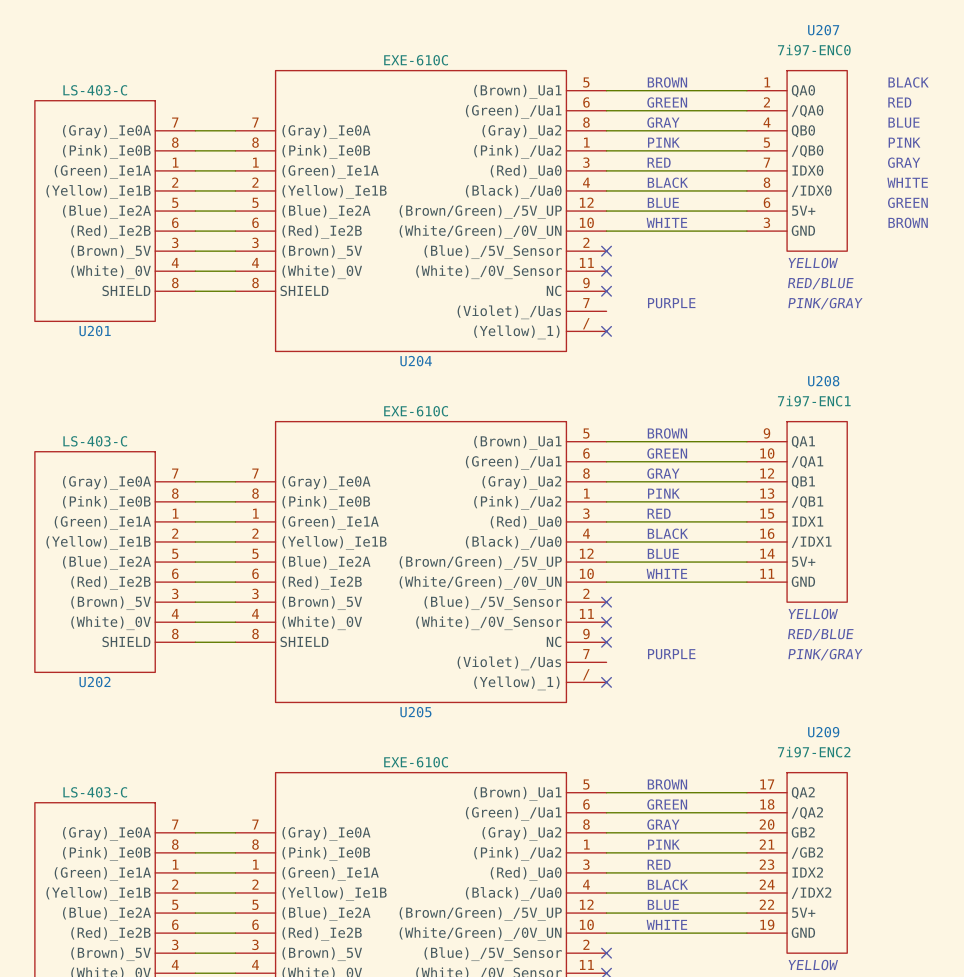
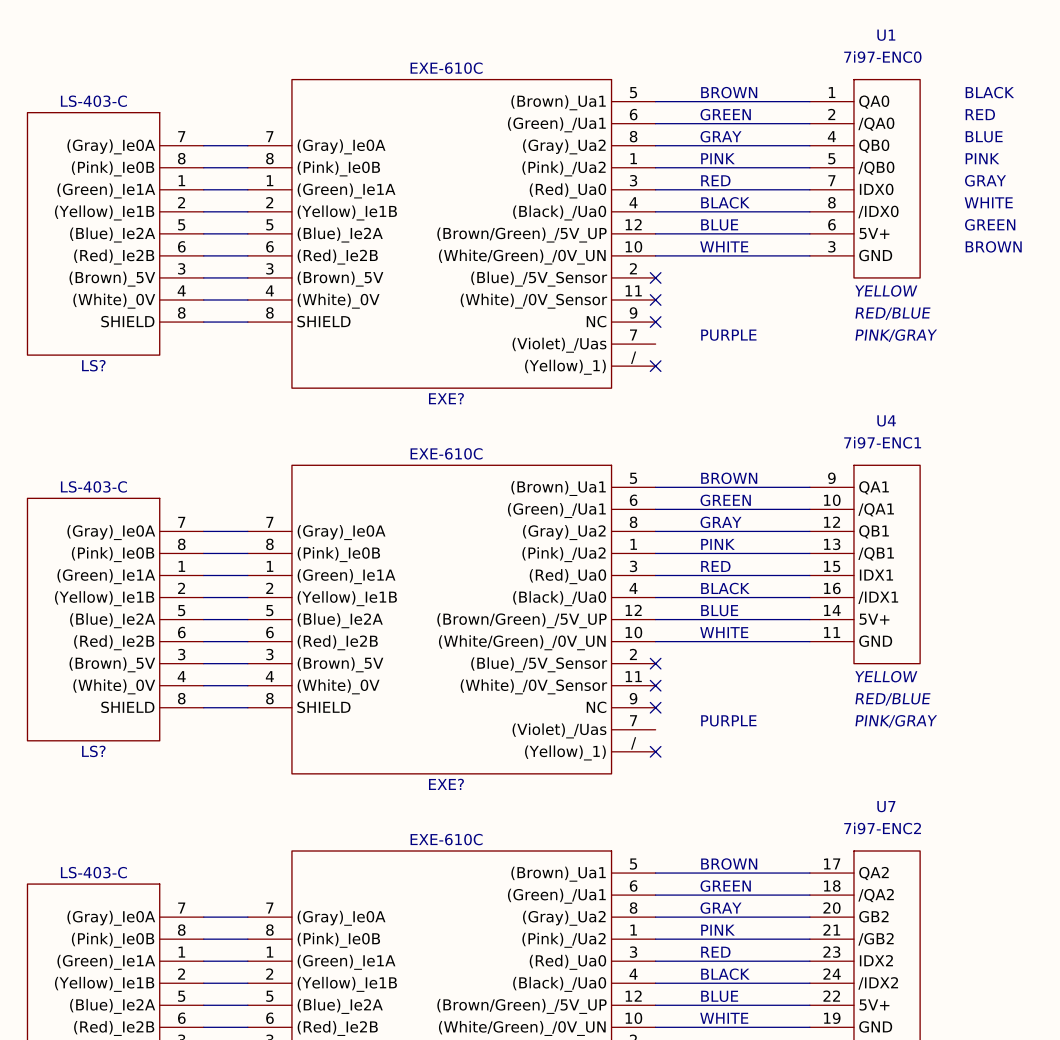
U207 name: U207 (823, 30) -> U1 (886, 35)
U201 name: U201 (95, 331) -> LS? (93, 365)
U204 name: U204 (416, 361) -> EXE? (446, 398)
U208 name: U208 (823, 381) -> U4 (886, 420)
U202 name: U202 (94, 682) -> LS? (93, 751)
U205 name: U205 (415, 712) -> EXE? (446, 784)
U209 name: U209 (823, 732) -> U7 (886, 806)

